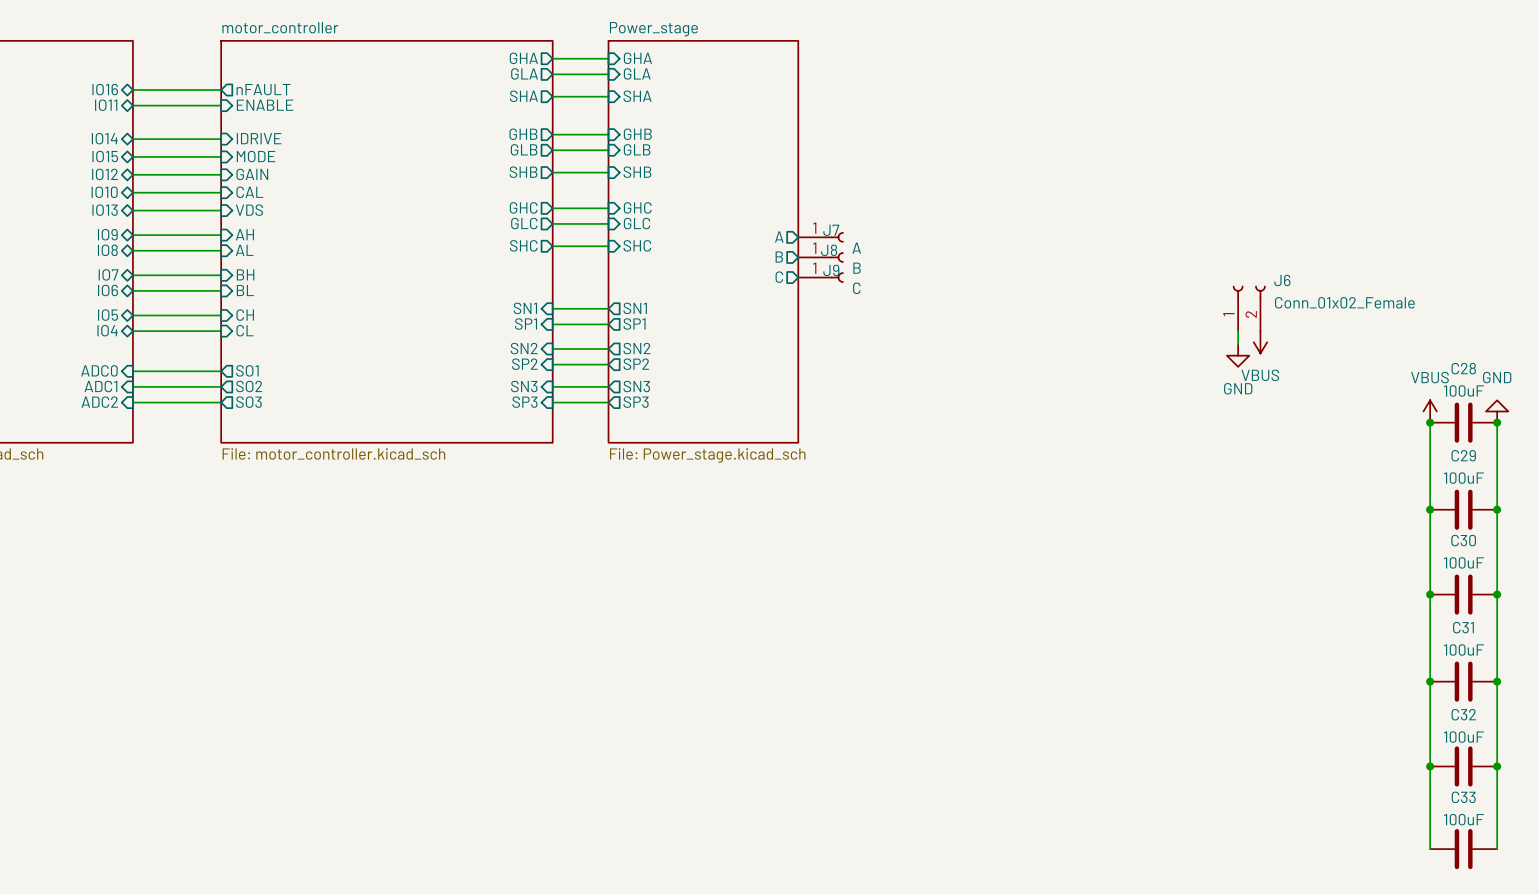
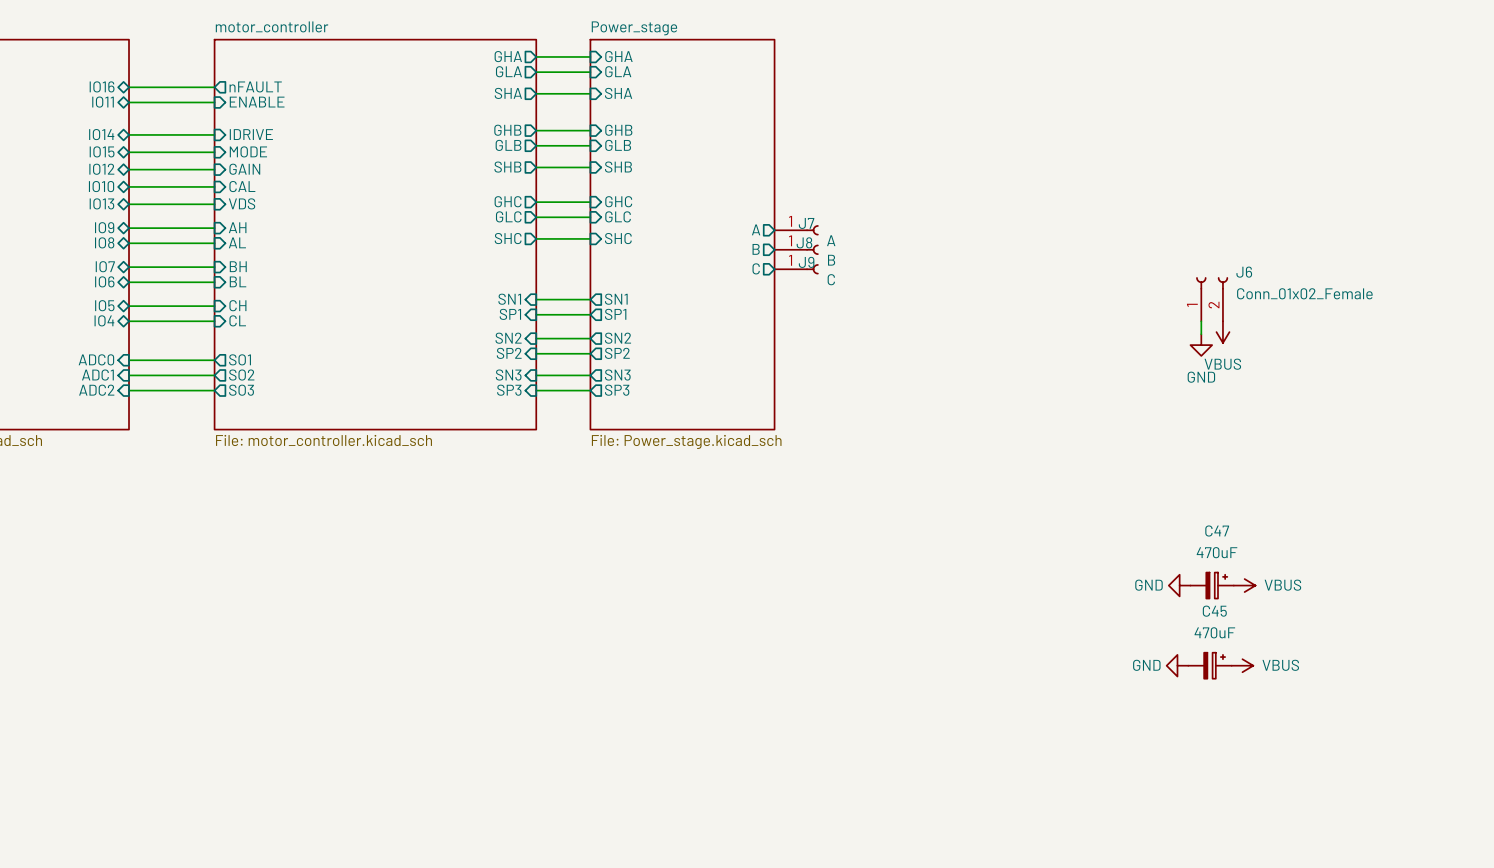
power symbol: VBUS (1430, 411) -> none
power symbol: GND (1497, 411) -> none
wire: (1430, 422) (1430, 849) -> none
junction: (1430, 422) -> none
C28: 100uF (1463, 422) -> none
wire: (1497, 422) (1497, 849) -> none
junction: (1497, 422) -> none
junction: (1430, 509) -> none
C29: 100uF (1463, 509) -> none
junction: (1497, 509) -> none
junction: (1430, 594) -> none
C30: 100uF (1463, 594) -> none
junction: (1497, 594) -> none
power symbol: none -> GND (1179, 585)
C47: none -> 470uF (1212, 585)
power symbol: none -> VBUS (1244, 585)
junction: (1430, 681) -> none
C31: 100uF (1463, 681) -> none
junction: (1497, 681) -> none
power symbol: none -> GND (1177, 665)
C45: none -> 470uF (1209, 665)
power symbol: none -> VBUS (1242, 665)
junction: (1430, 766) -> none
C32: 100uF (1463, 766) -> none
junction: (1497, 766) -> none
C33: 100uF (1463, 849) -> none

